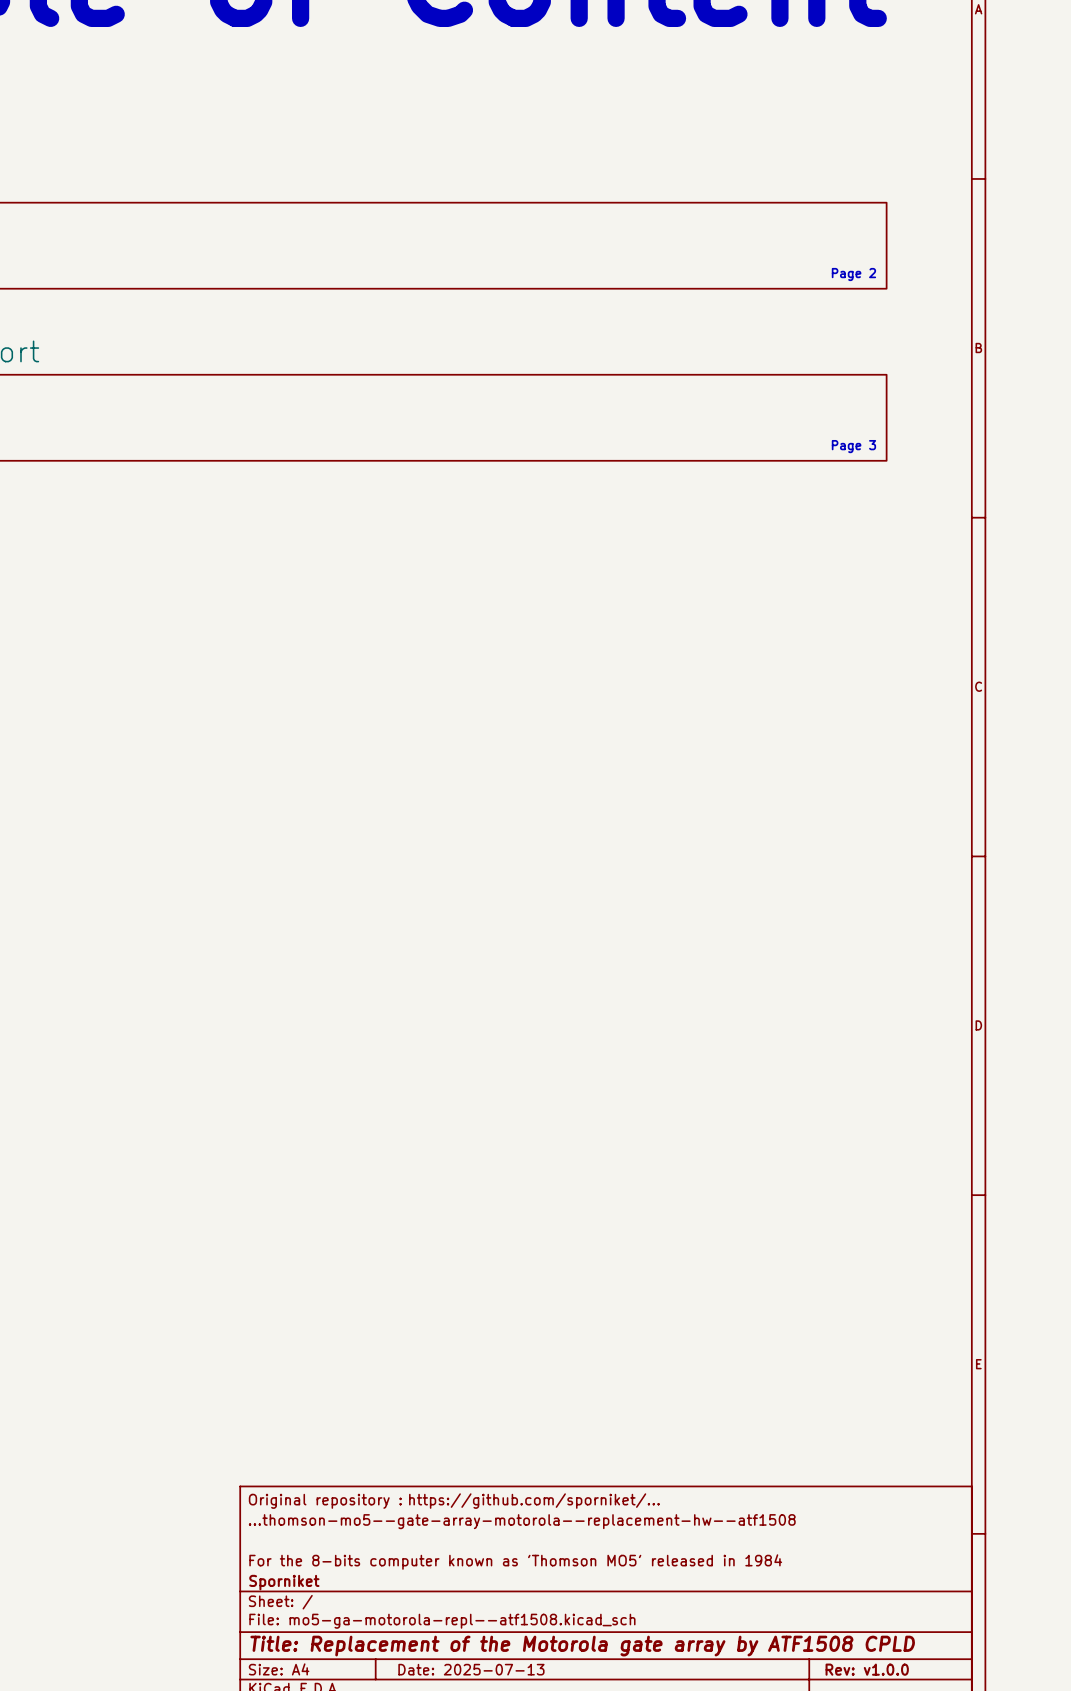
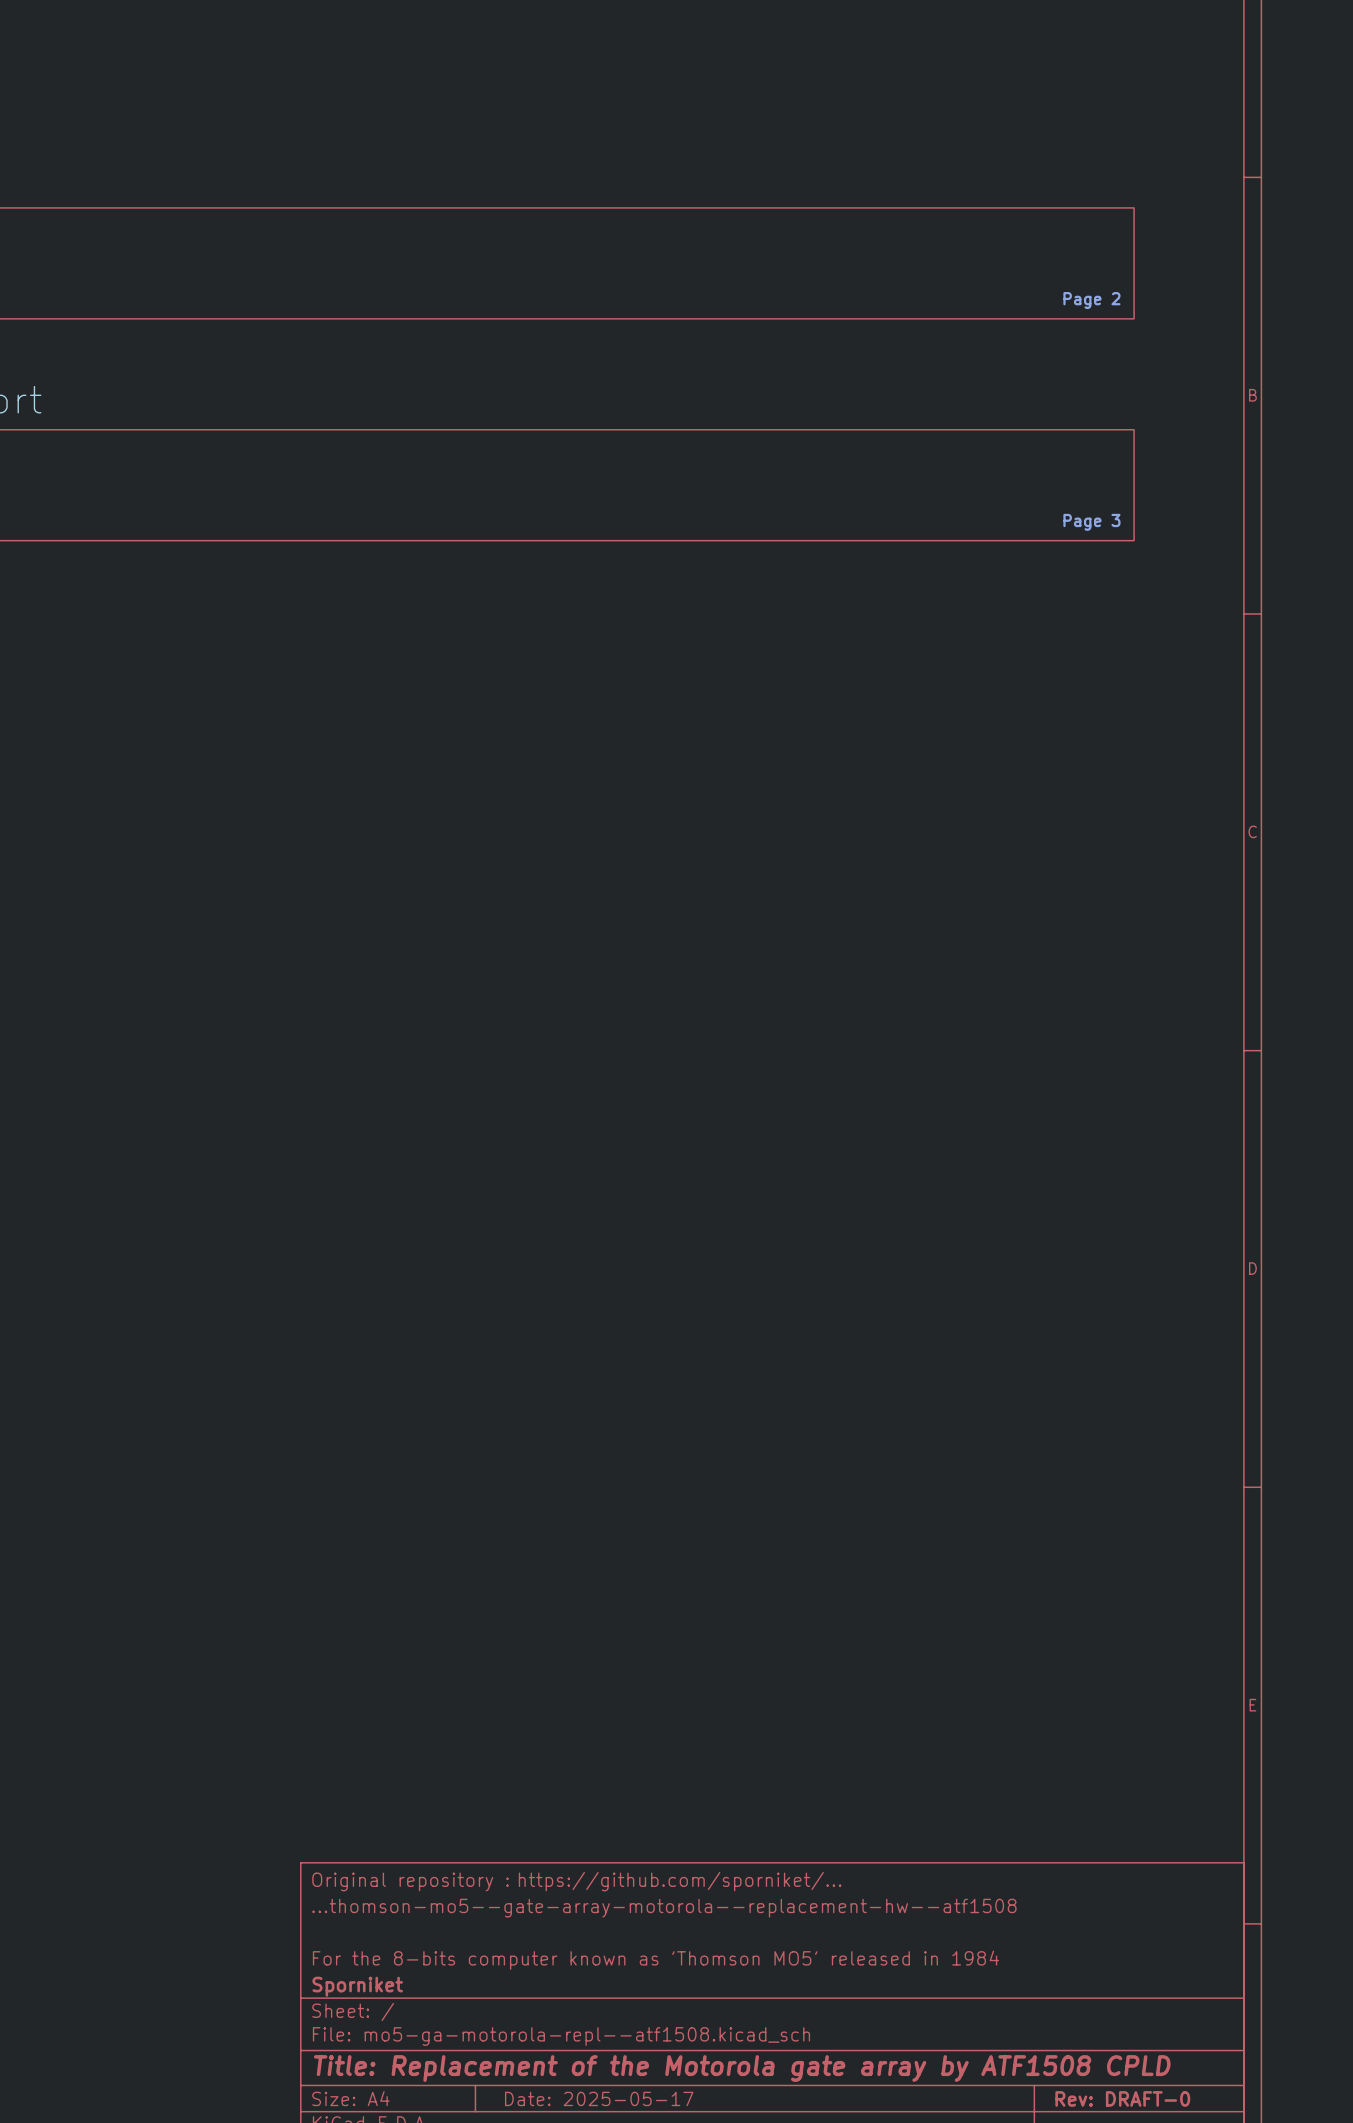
title block: Date: 2025-07-13 (471, 1669) -> Date: 2025-05-17 (599, 2098)
title block: Rev: v1.0.0 (867, 1669) -> Rev: DRAFT-0 (1122, 2098)

